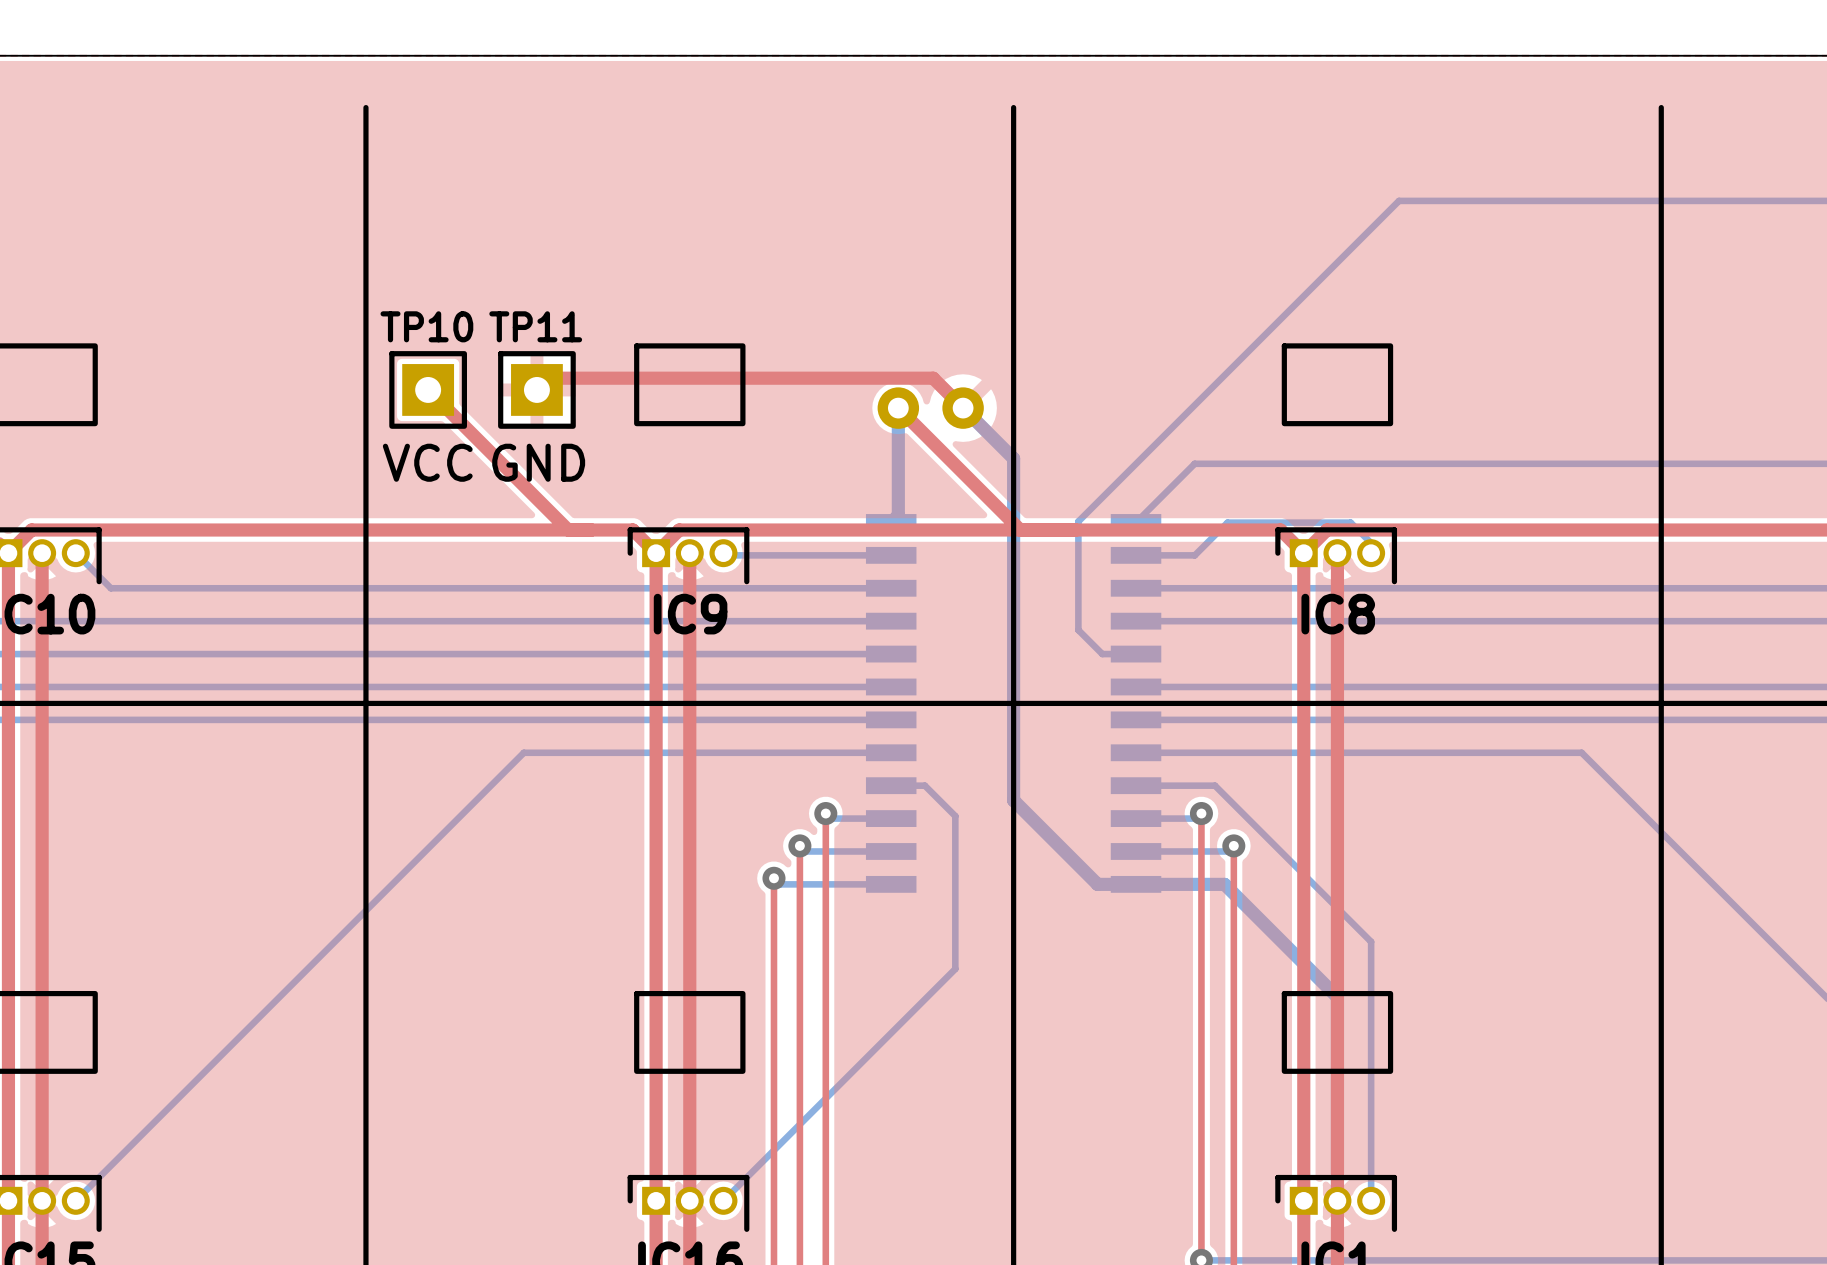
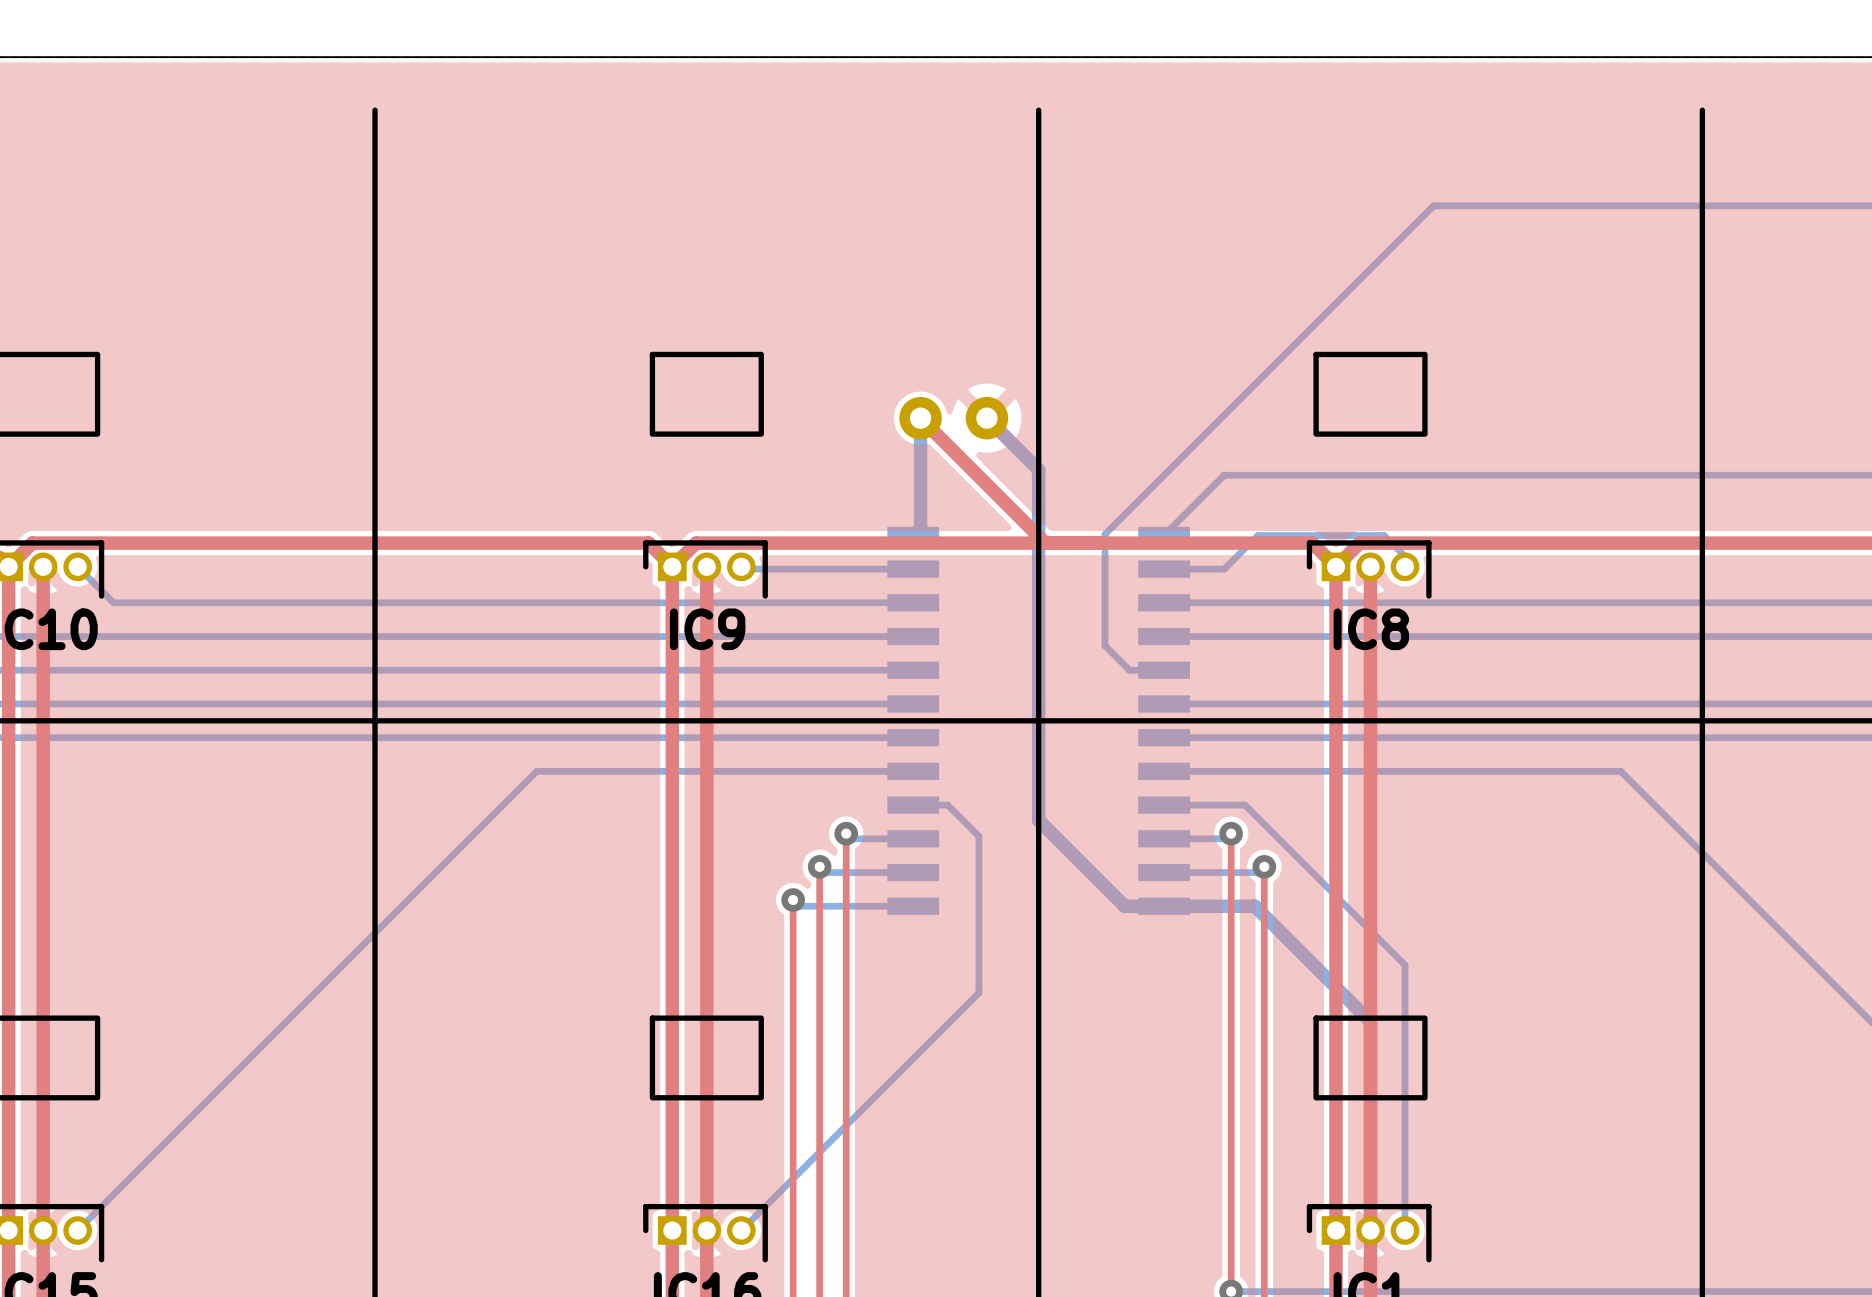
top track: (428, 389) (568, 530) -> none
TP10: (428, 389) -> none
top track: (536, 389) (548, 378) (933, 378) (963, 408) -> none
TP11: (536, 389) -> none
text: VCC (427, 462) -> none
text: GND (538, 462) -> none

